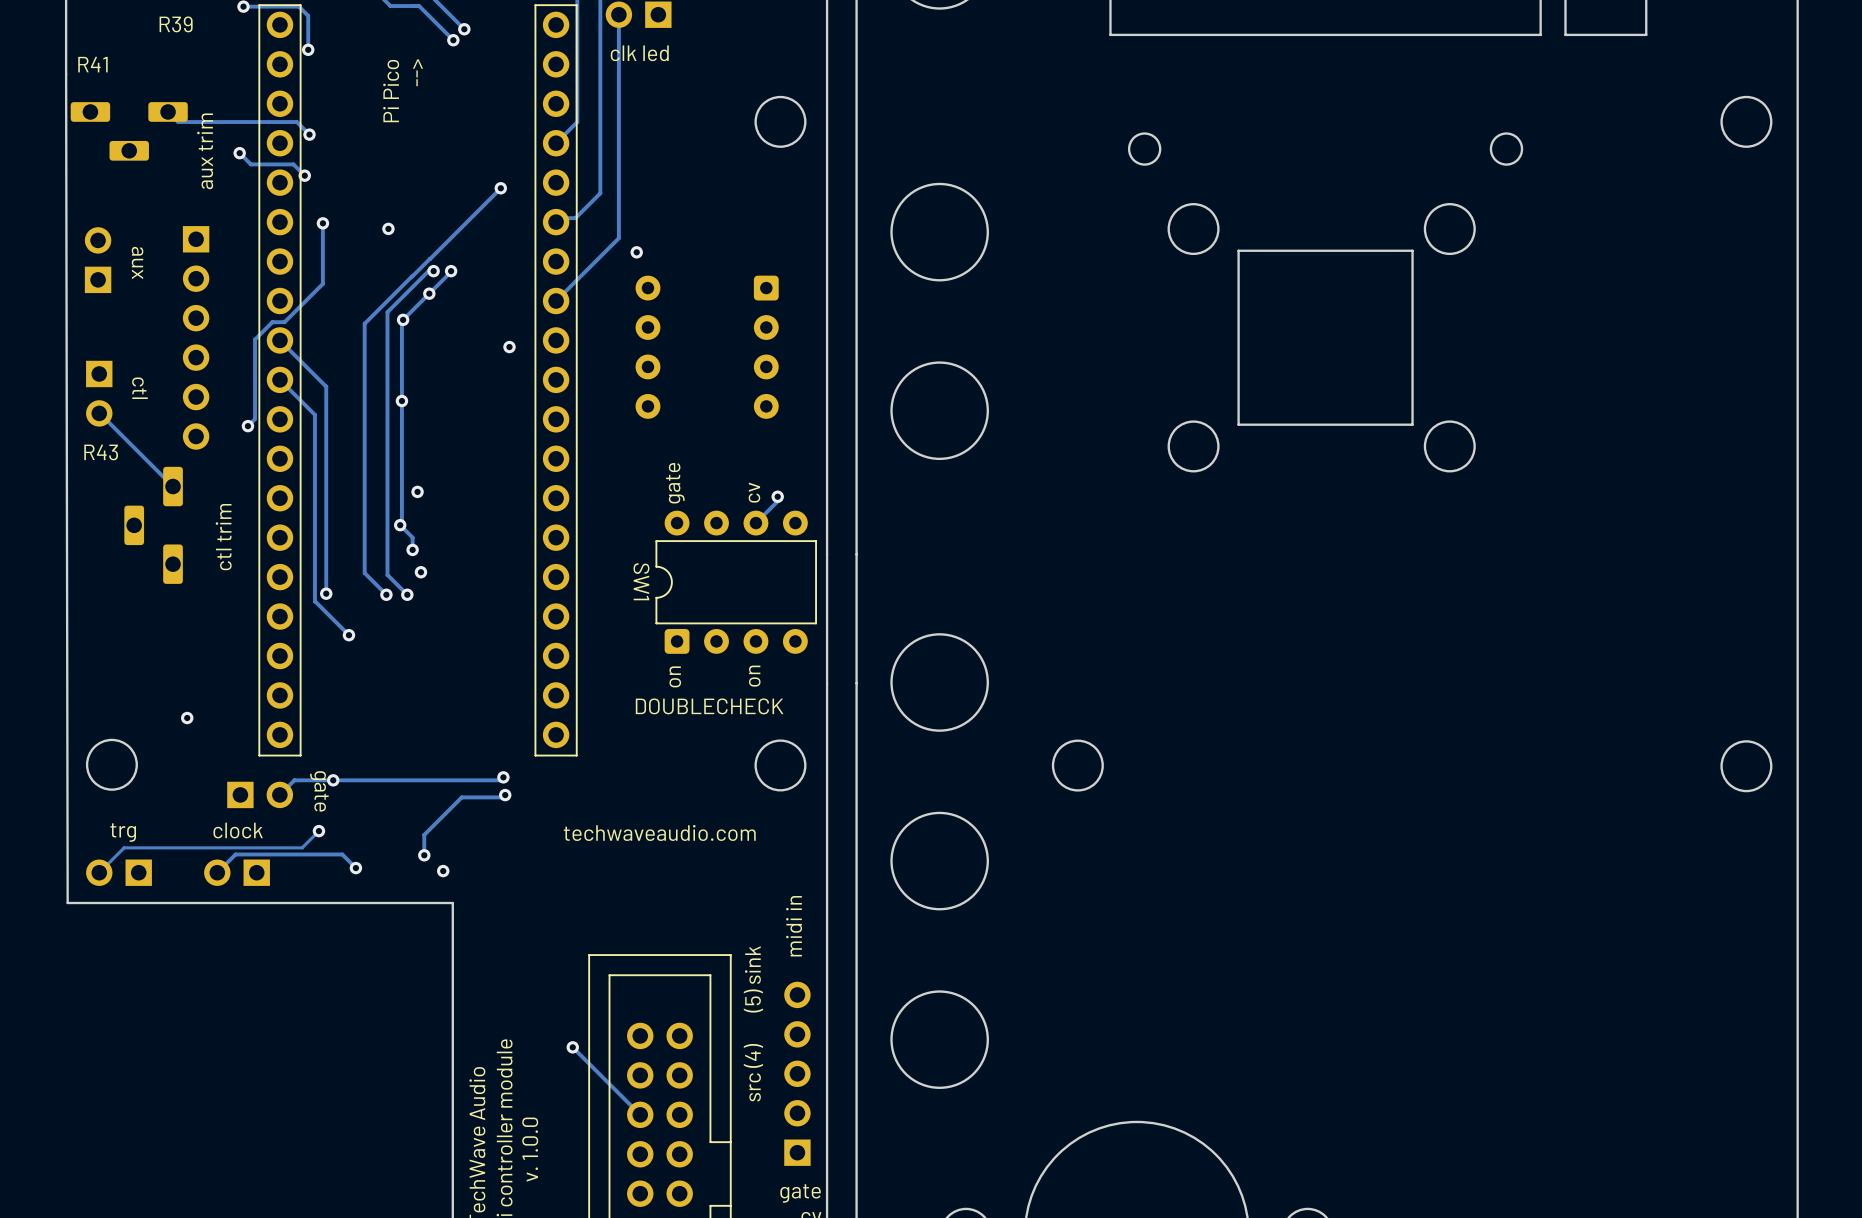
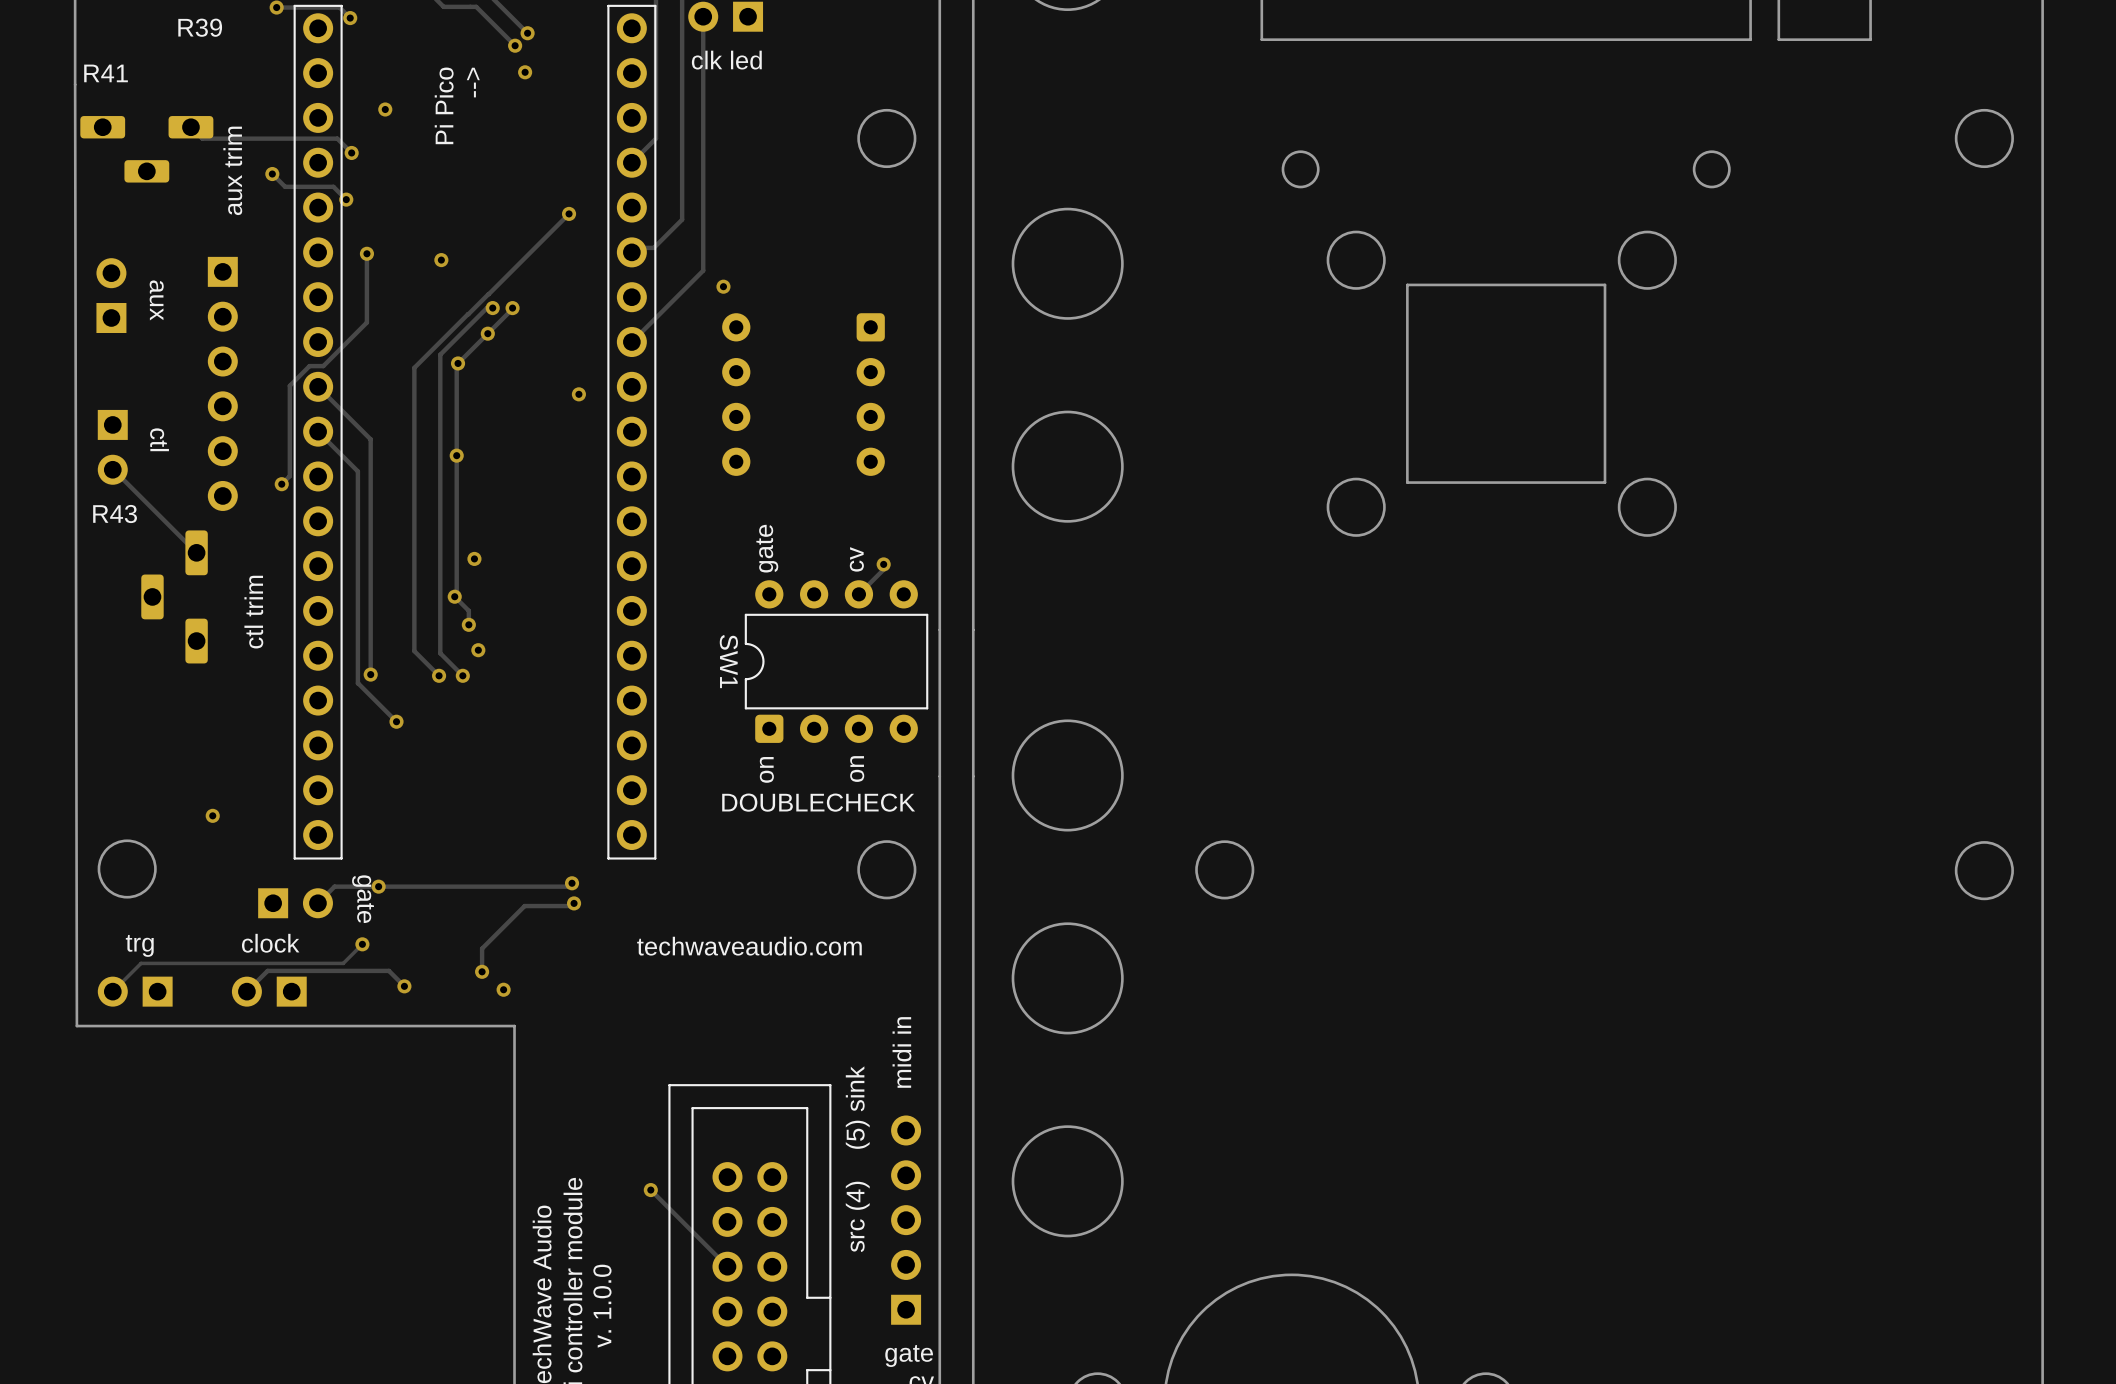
track: (308, 15) (308, 49) -> none
via: none -> (350, 18)
via: (308, 49) -> none
via: none -> (525, 72)
via: none -> (385, 109)

